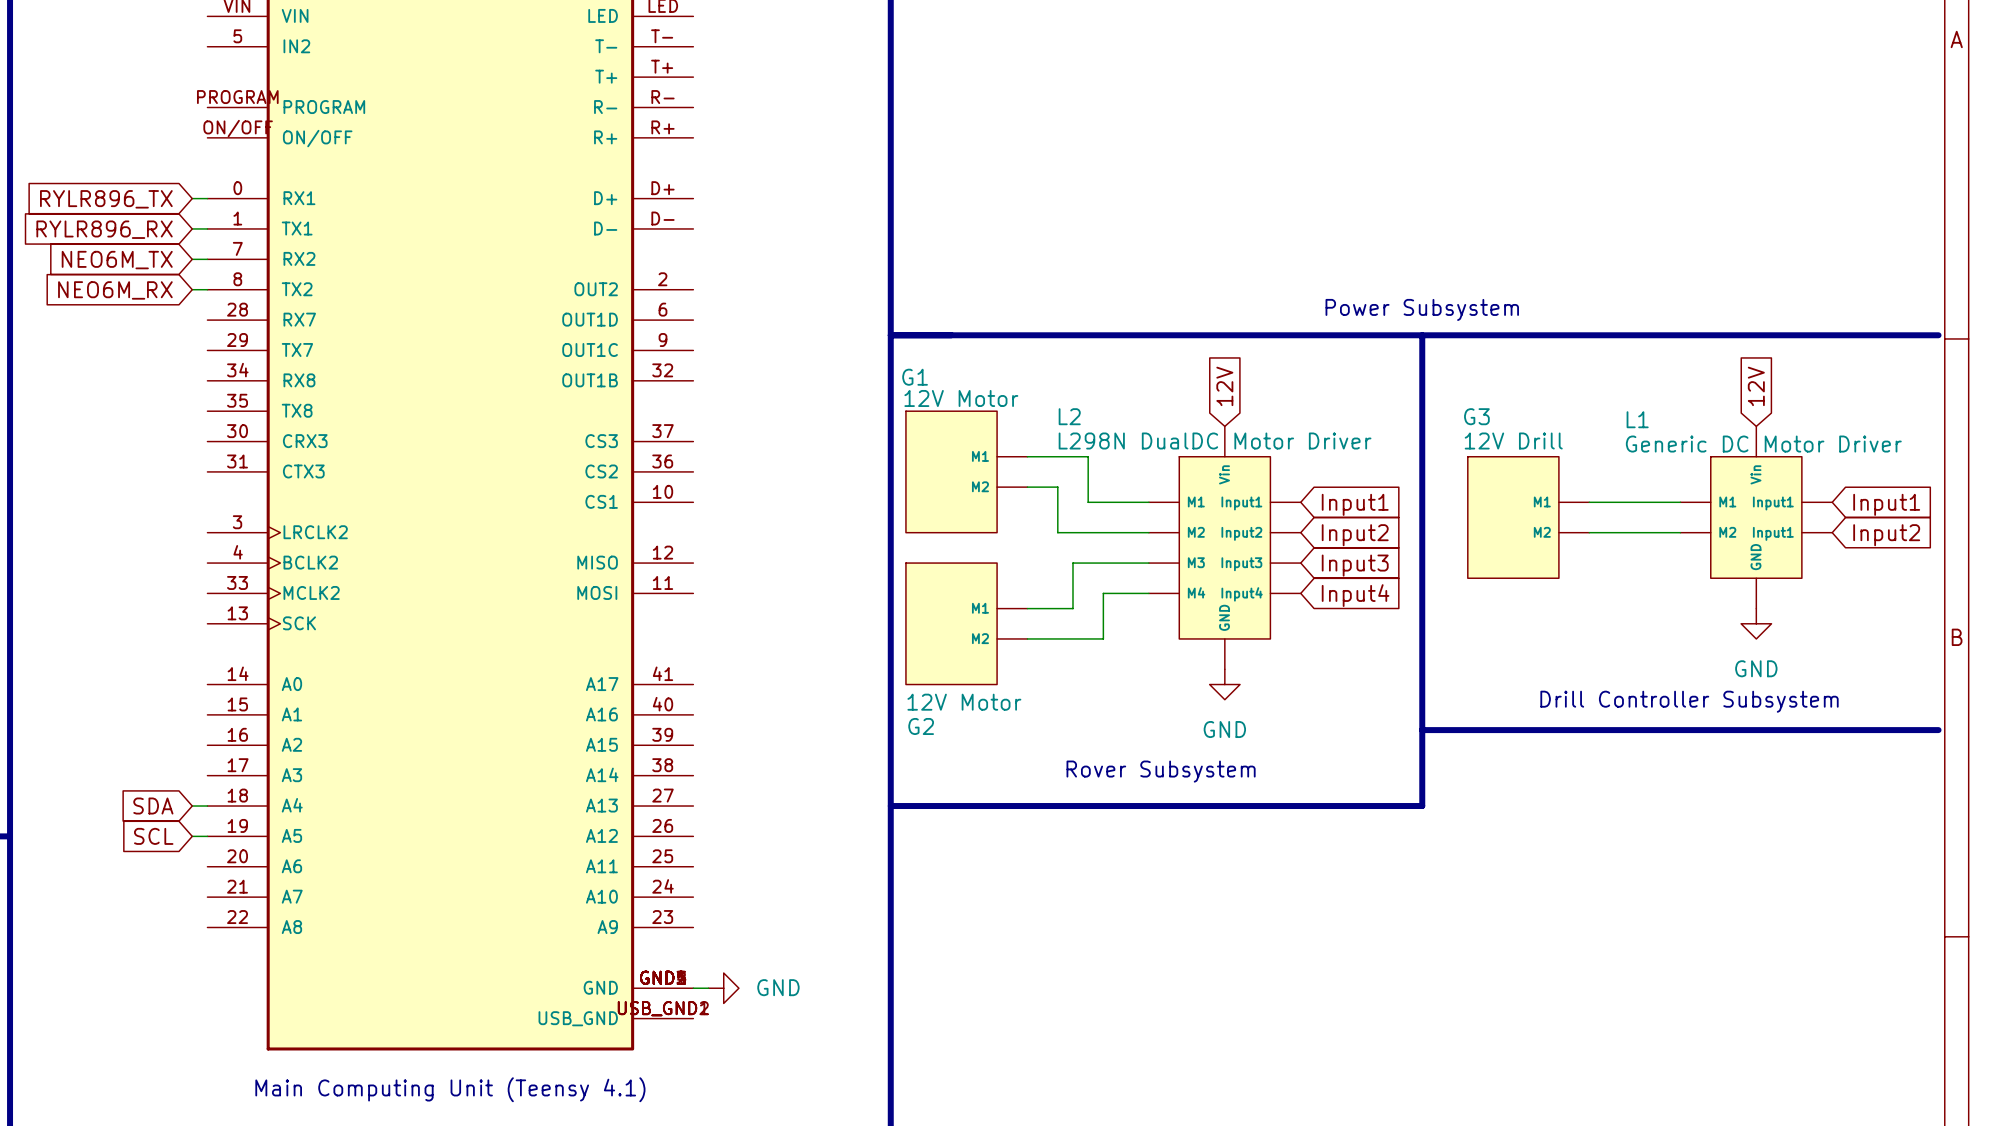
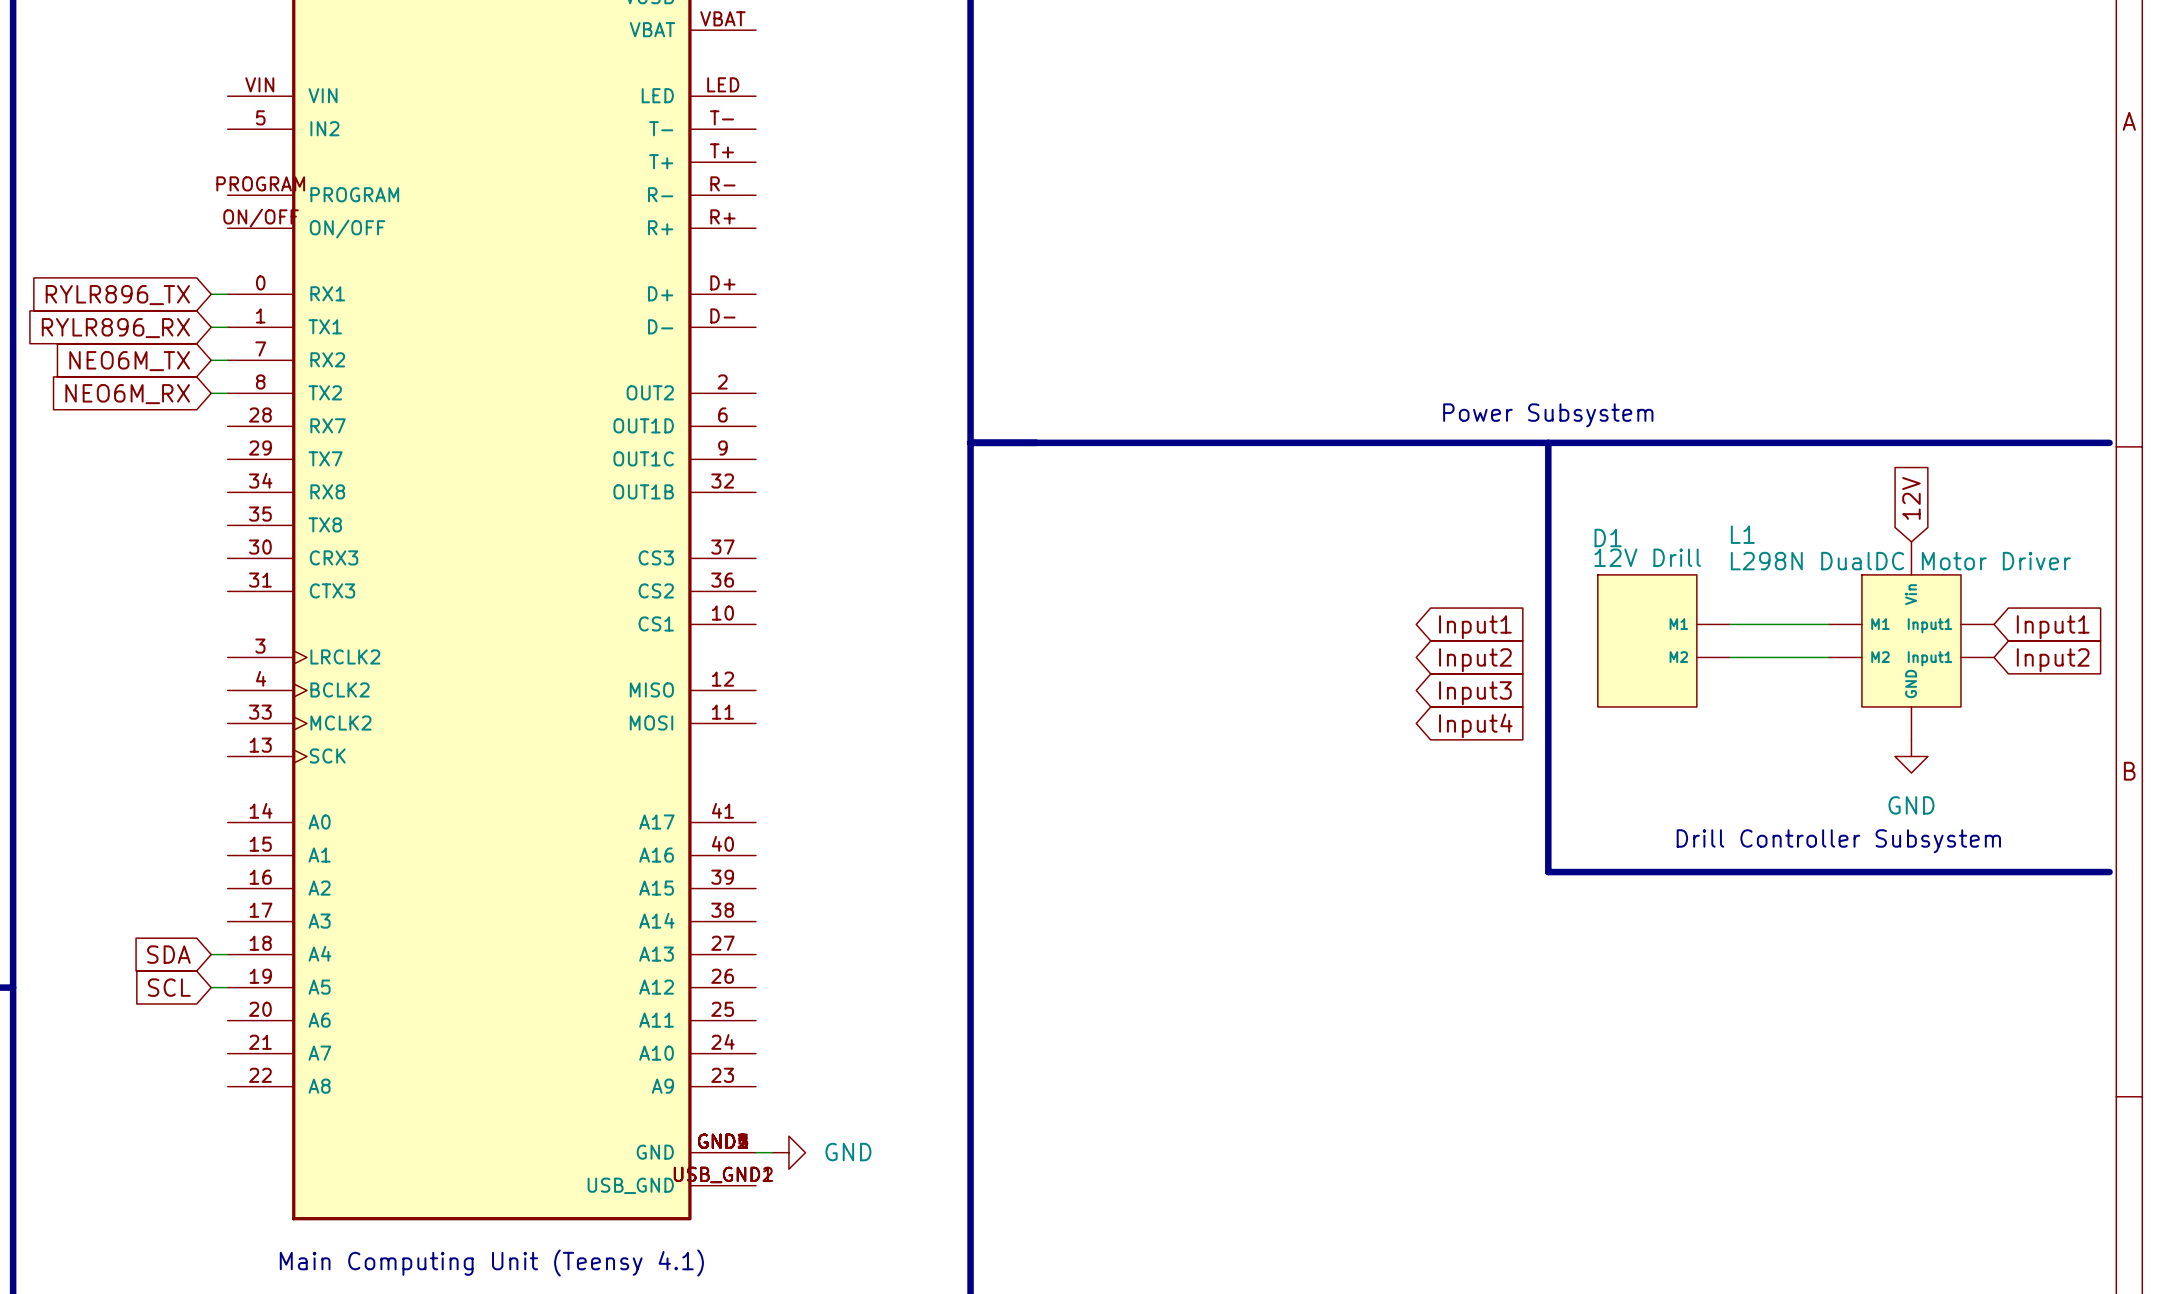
global label: 12V (1224, 386) -> none
G3 name: G3 (1476, 416) -> D1 (1608, 537)
L1 name position: L1 (1637, 419) -> L1 (1742, 534)
L1 value: Generic DC Motor Driver (1763, 444) -> L298N DualDC Motor Driver (1900, 561)
wire: (1027, 456) (1088, 456) (1088, 502) (1148, 502) -> none
G1: 12V Motor (966, 471) -> none
wire: (1027, 487) (1057, 487) (1057, 532) (1148, 532) -> none
L2: L298N DualDC Motor Driver (1224, 547) -> none
wire: (1148, 563) (1072, 563) (1072, 608) (1027, 608) -> none
wire: (1148, 593) (1103, 593) (1103, 638) (1027, 638) -> none
G2: 12V Motor (966, 623) -> none
power symbol: GND (1224, 684) -> none
line: (1422, 730) (1422, 806) (890, 806) -> none
text: Rover Subsystem (1161, 771) -> none

